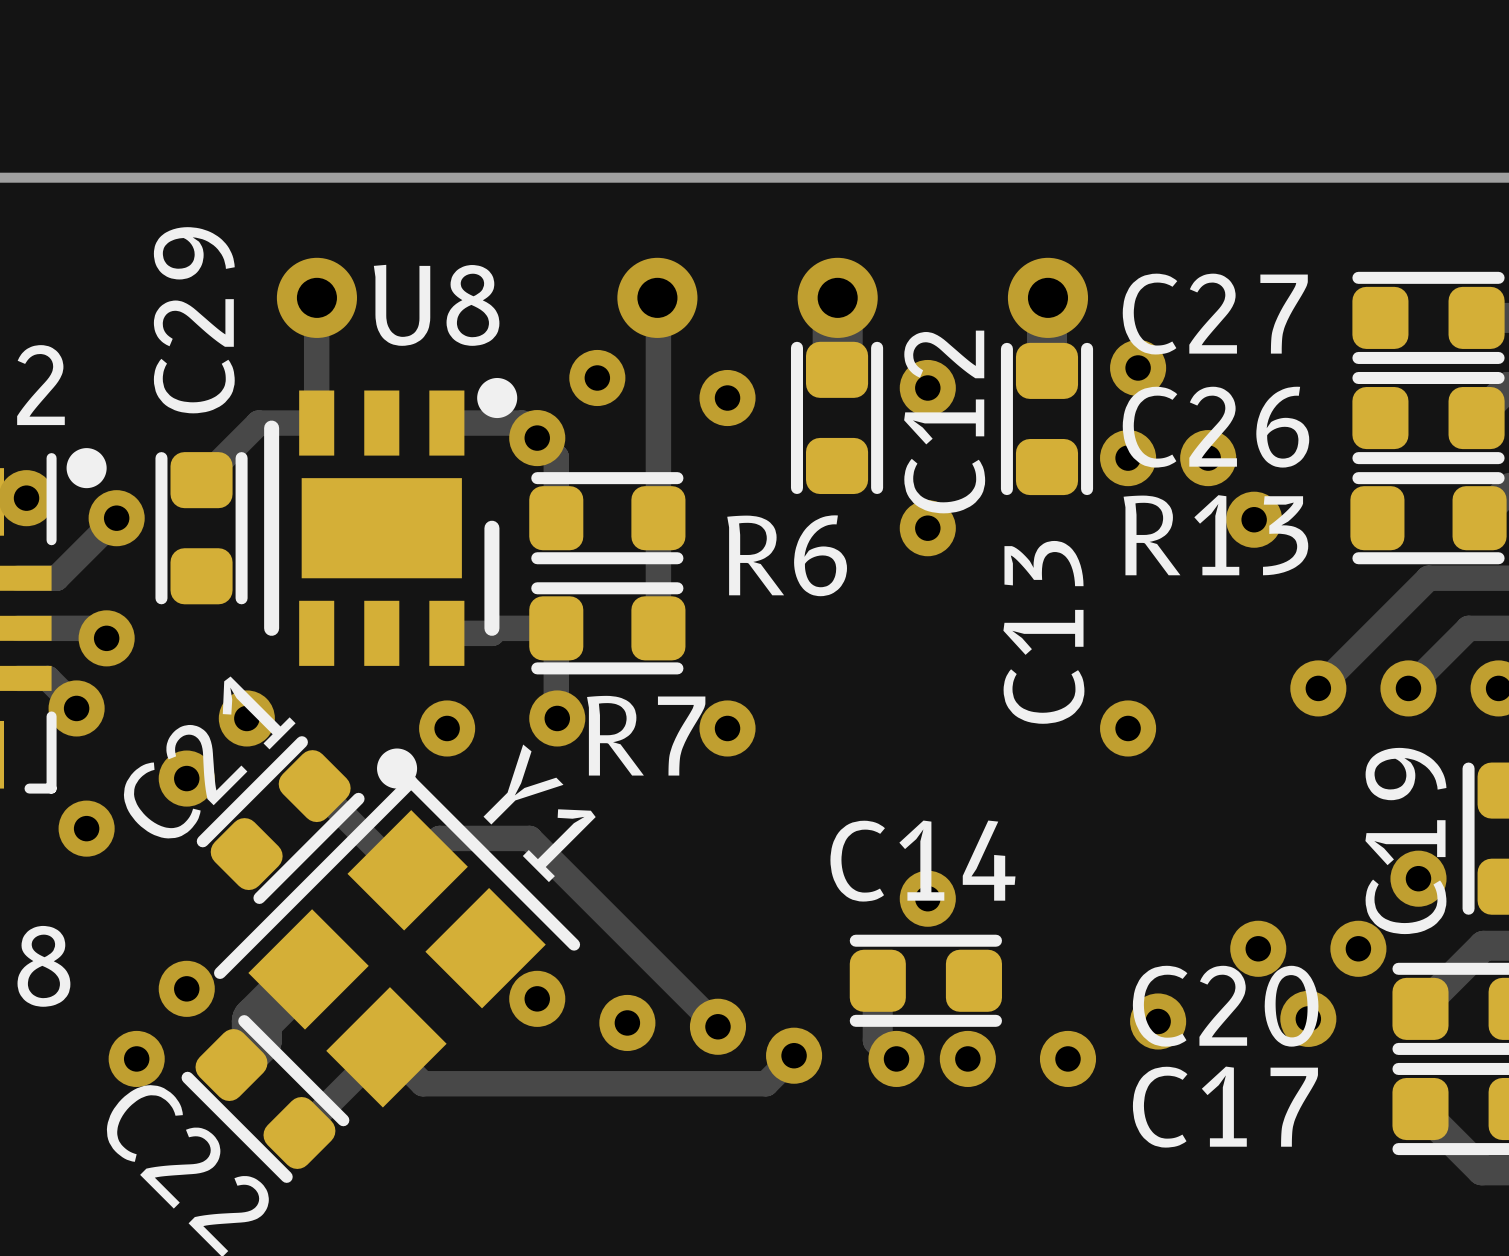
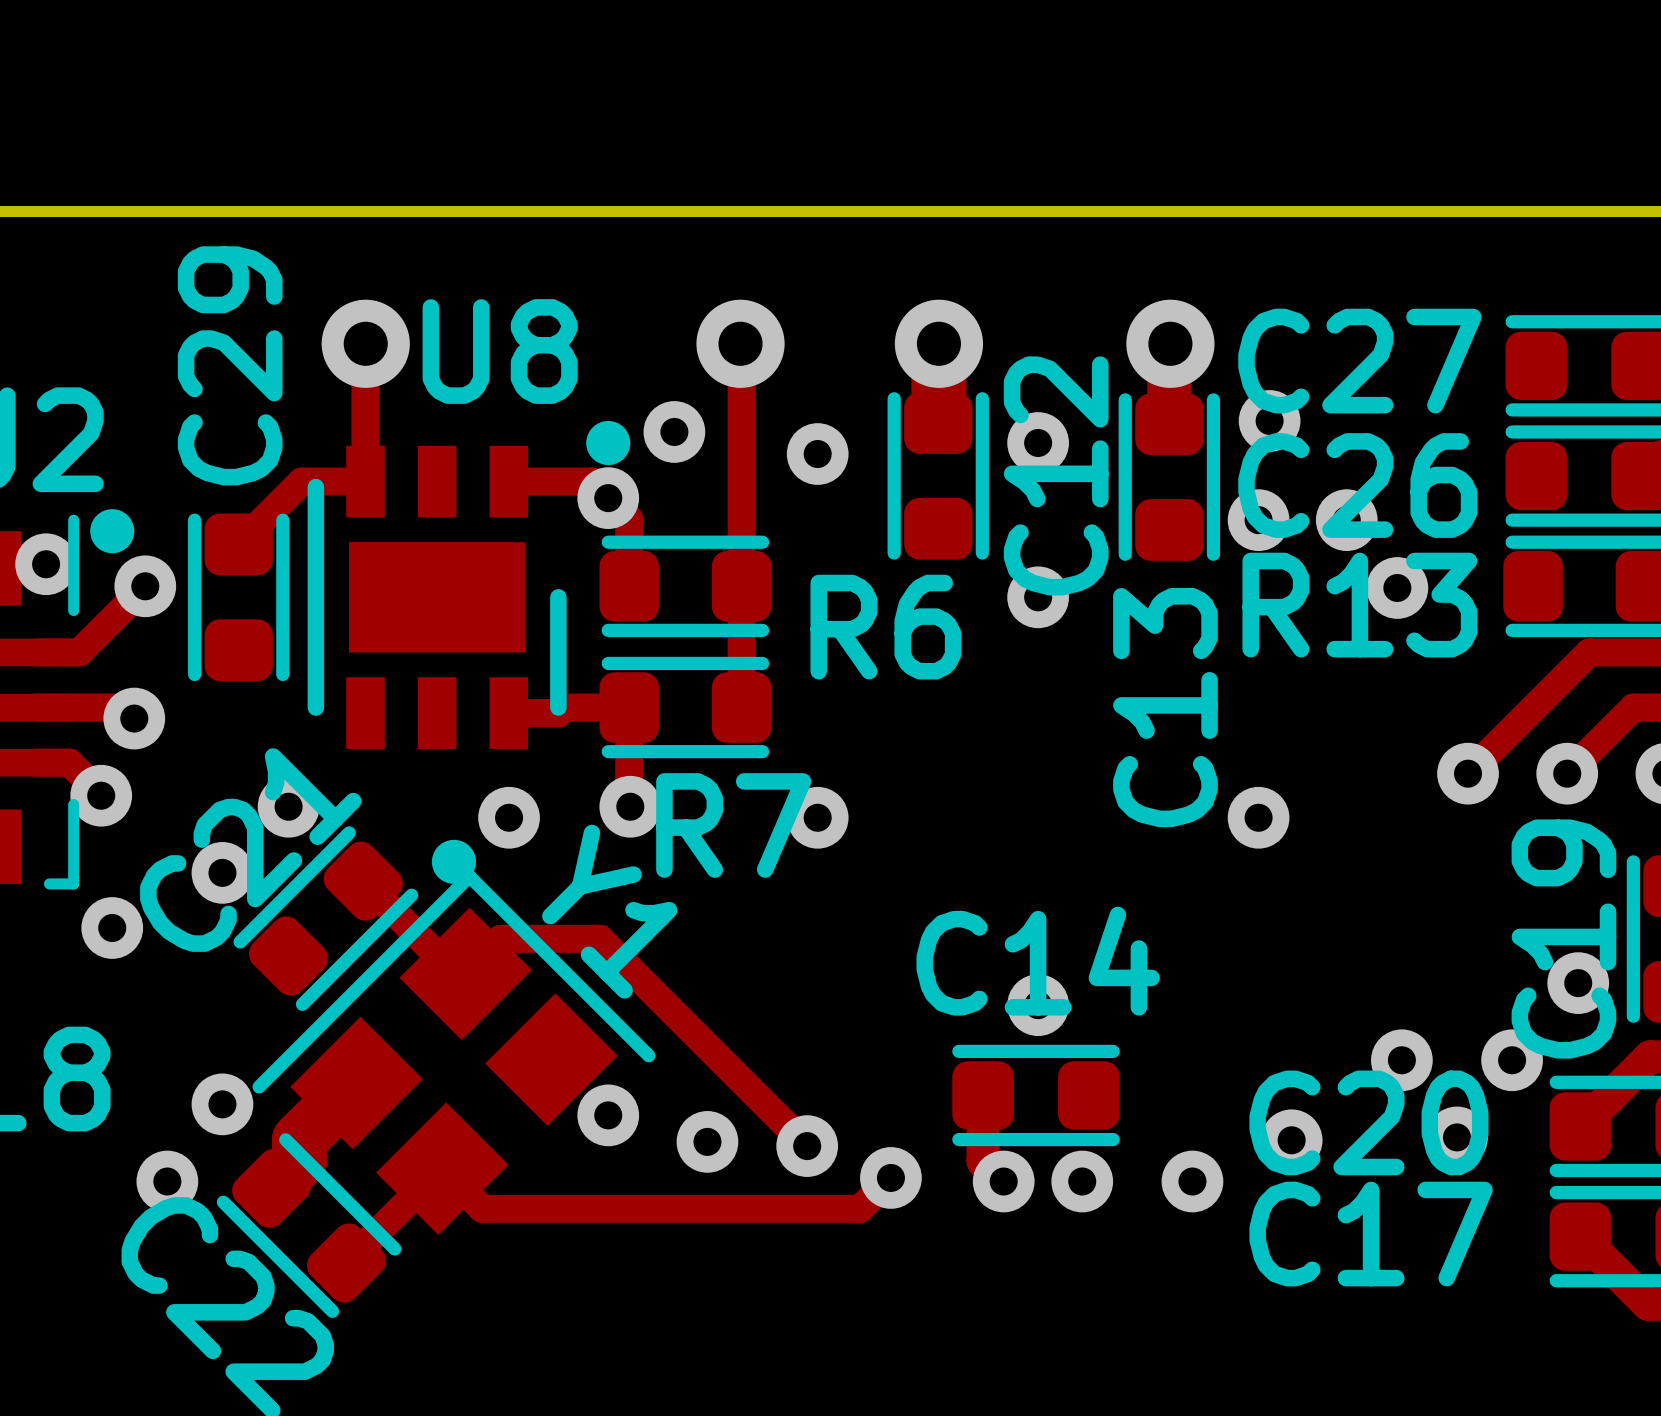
drawing position: (497, 398) -> (608, 443)

